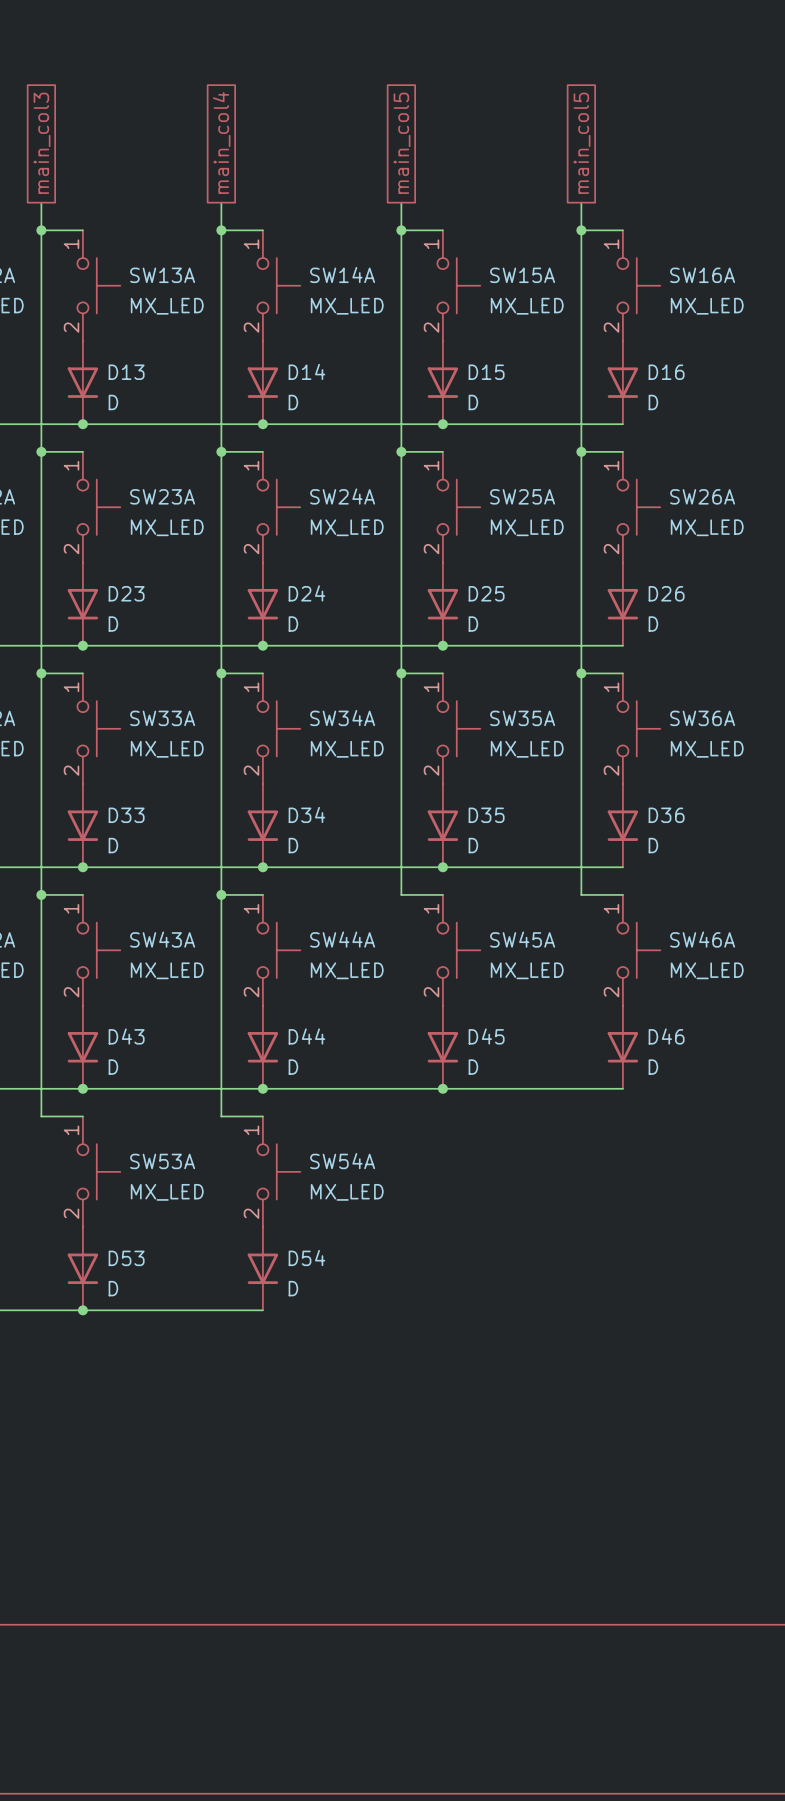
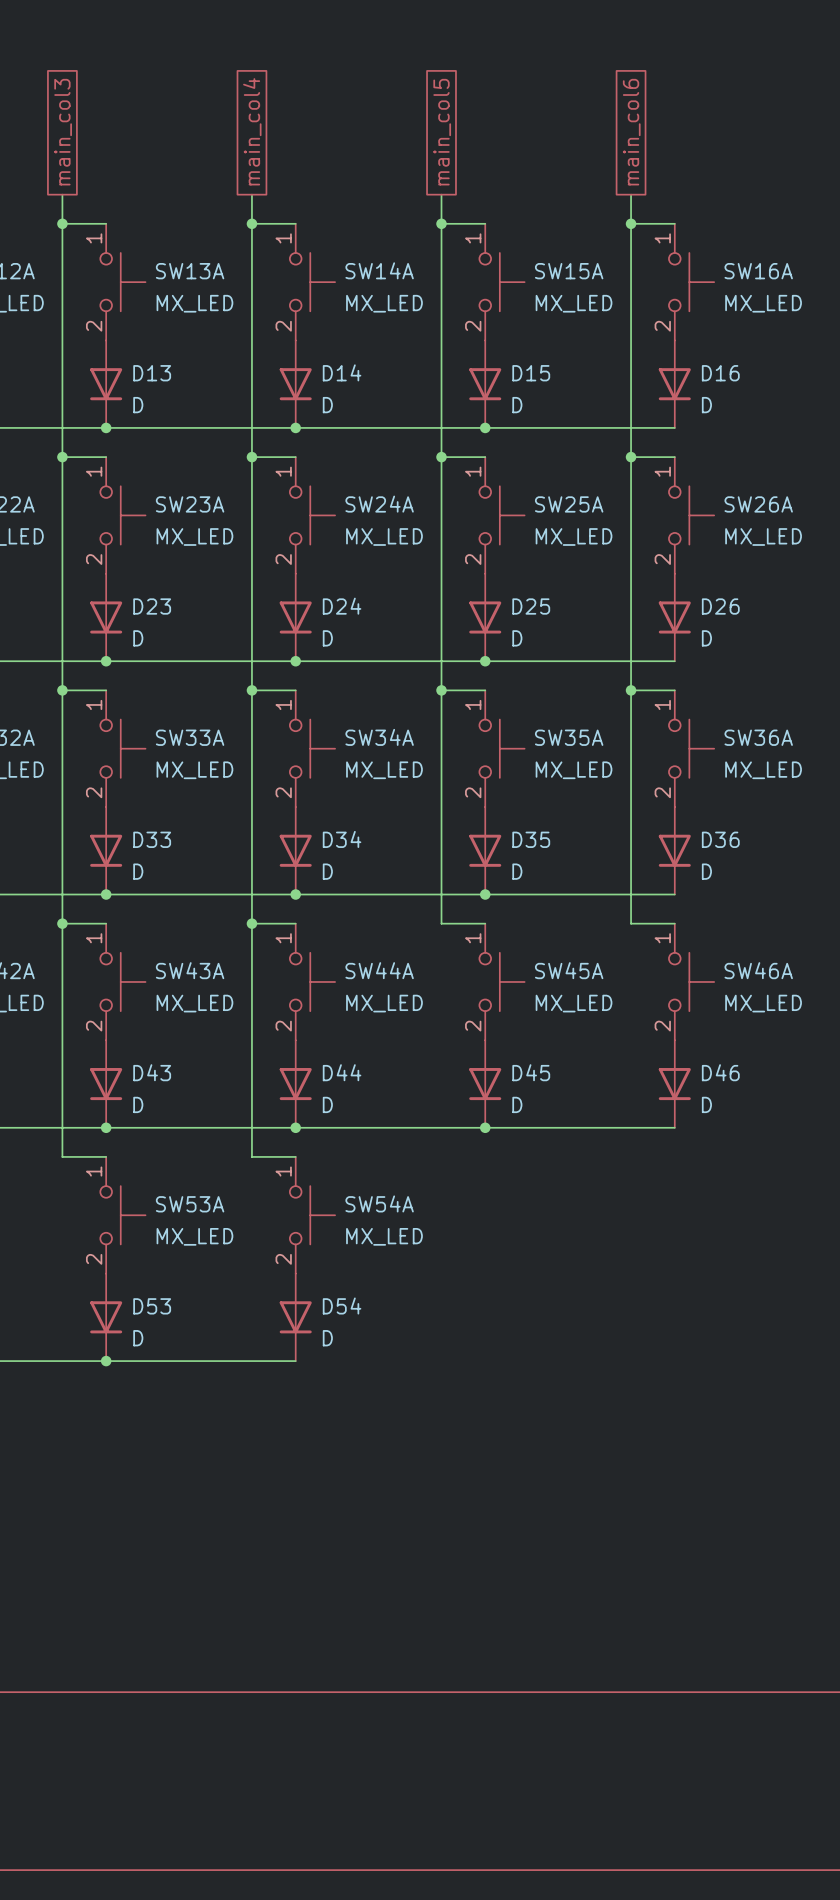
global label: main_col5 (582, 143) -> main_col6 (631, 132)

